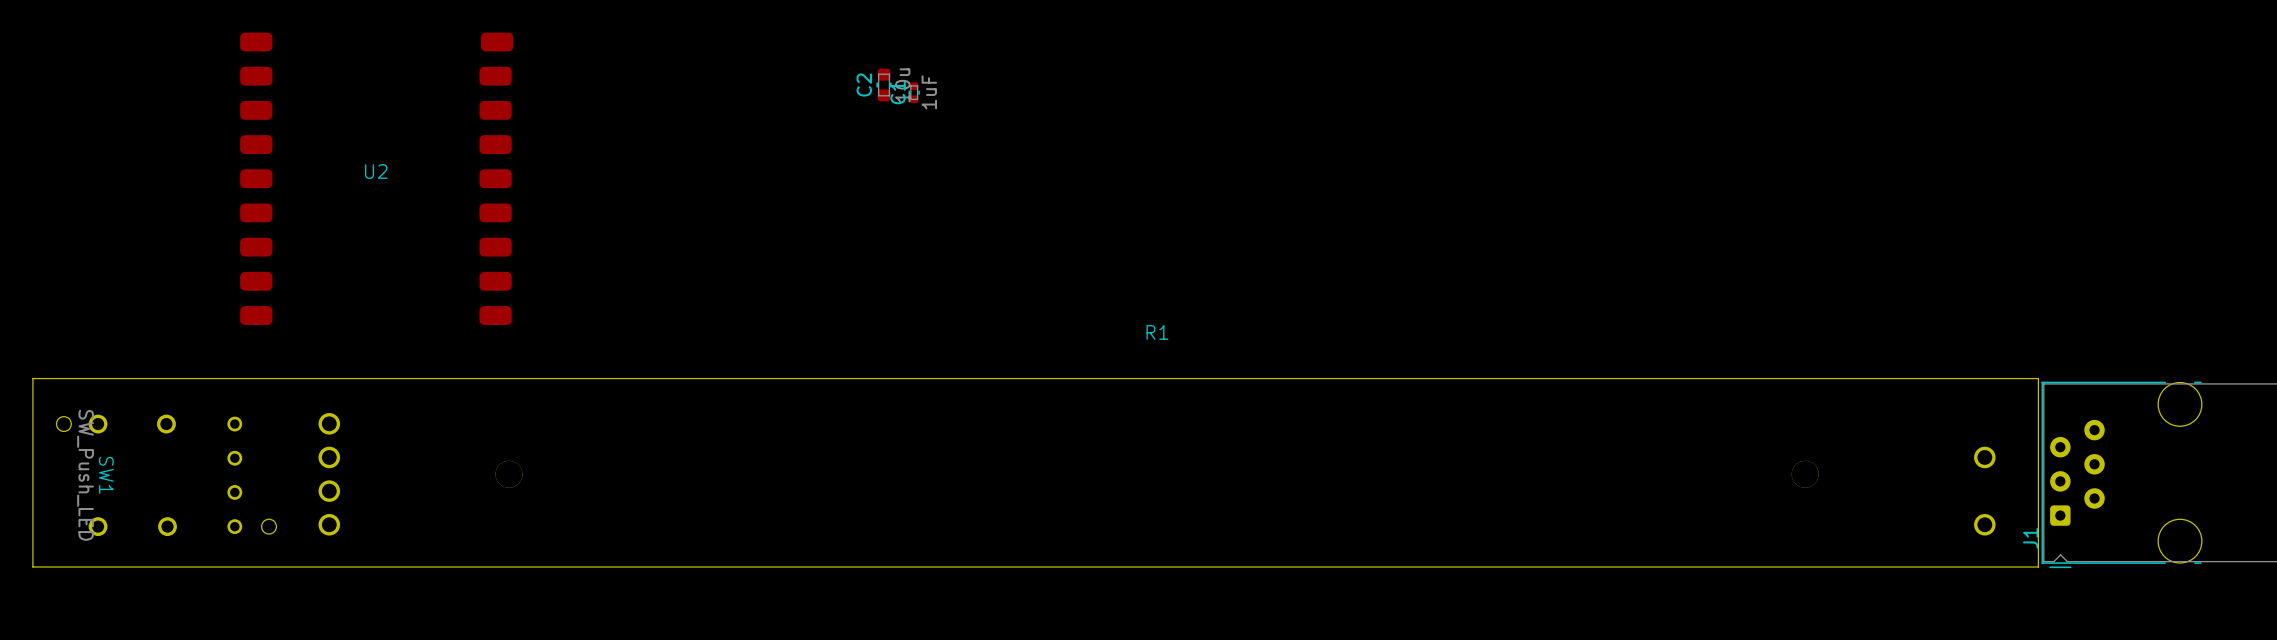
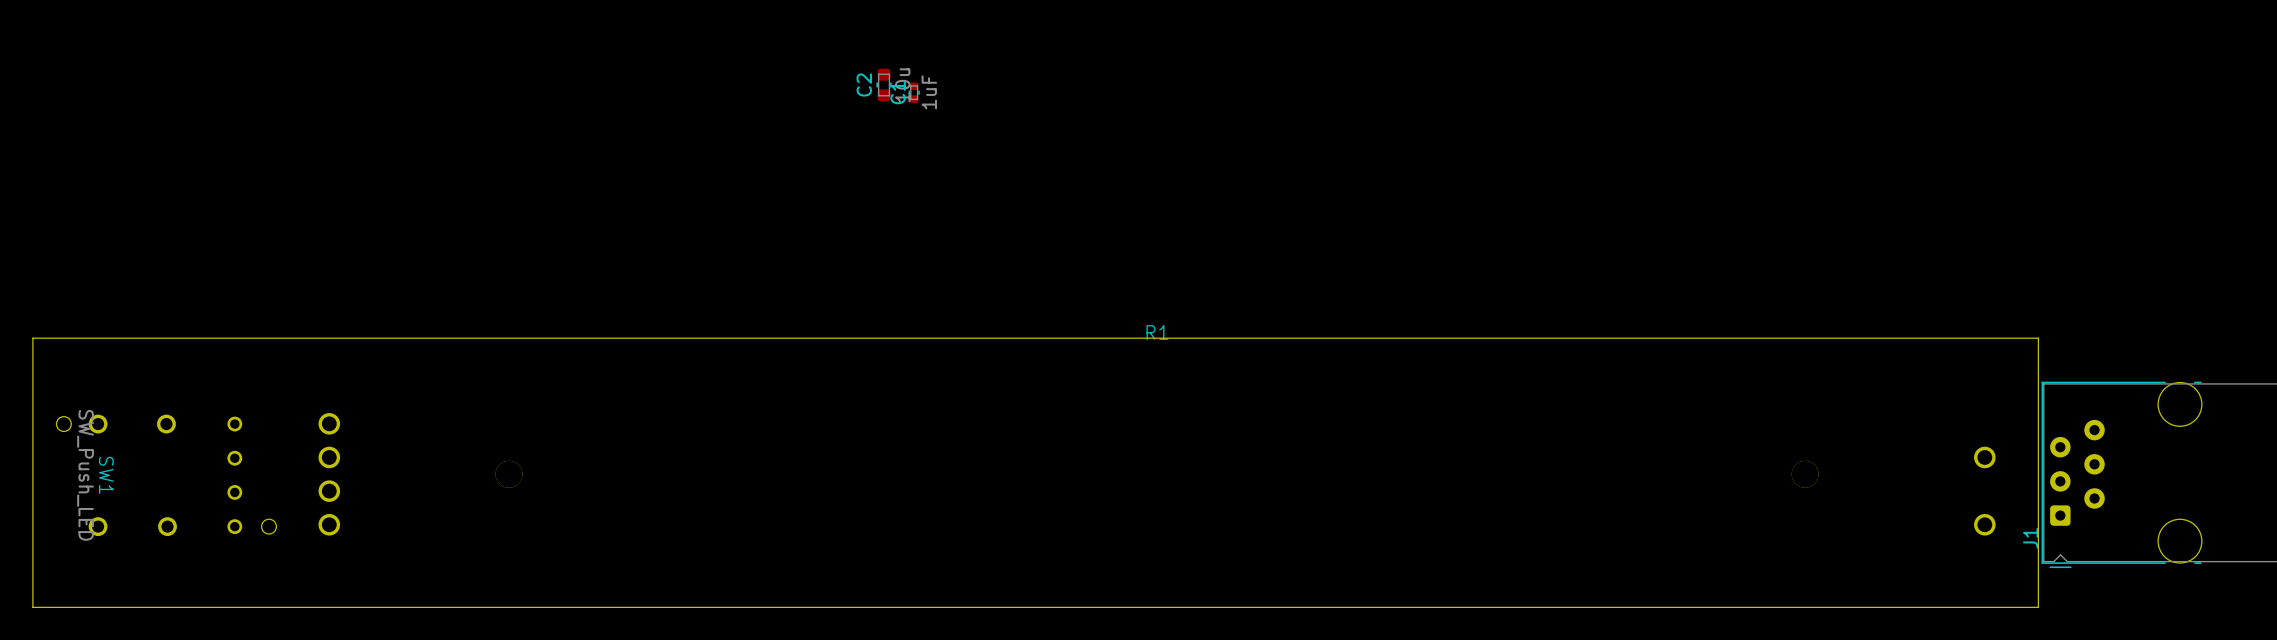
U2: (376, 178) -> none
board edge: (32, 378) (2038, 378) -> (32, 378) (32, 338) (2038, 338) (2038, 378)
board edge: (32, 567) (2038, 567) -> (32, 567) (32, 607) (2038, 607) (2038, 567)

